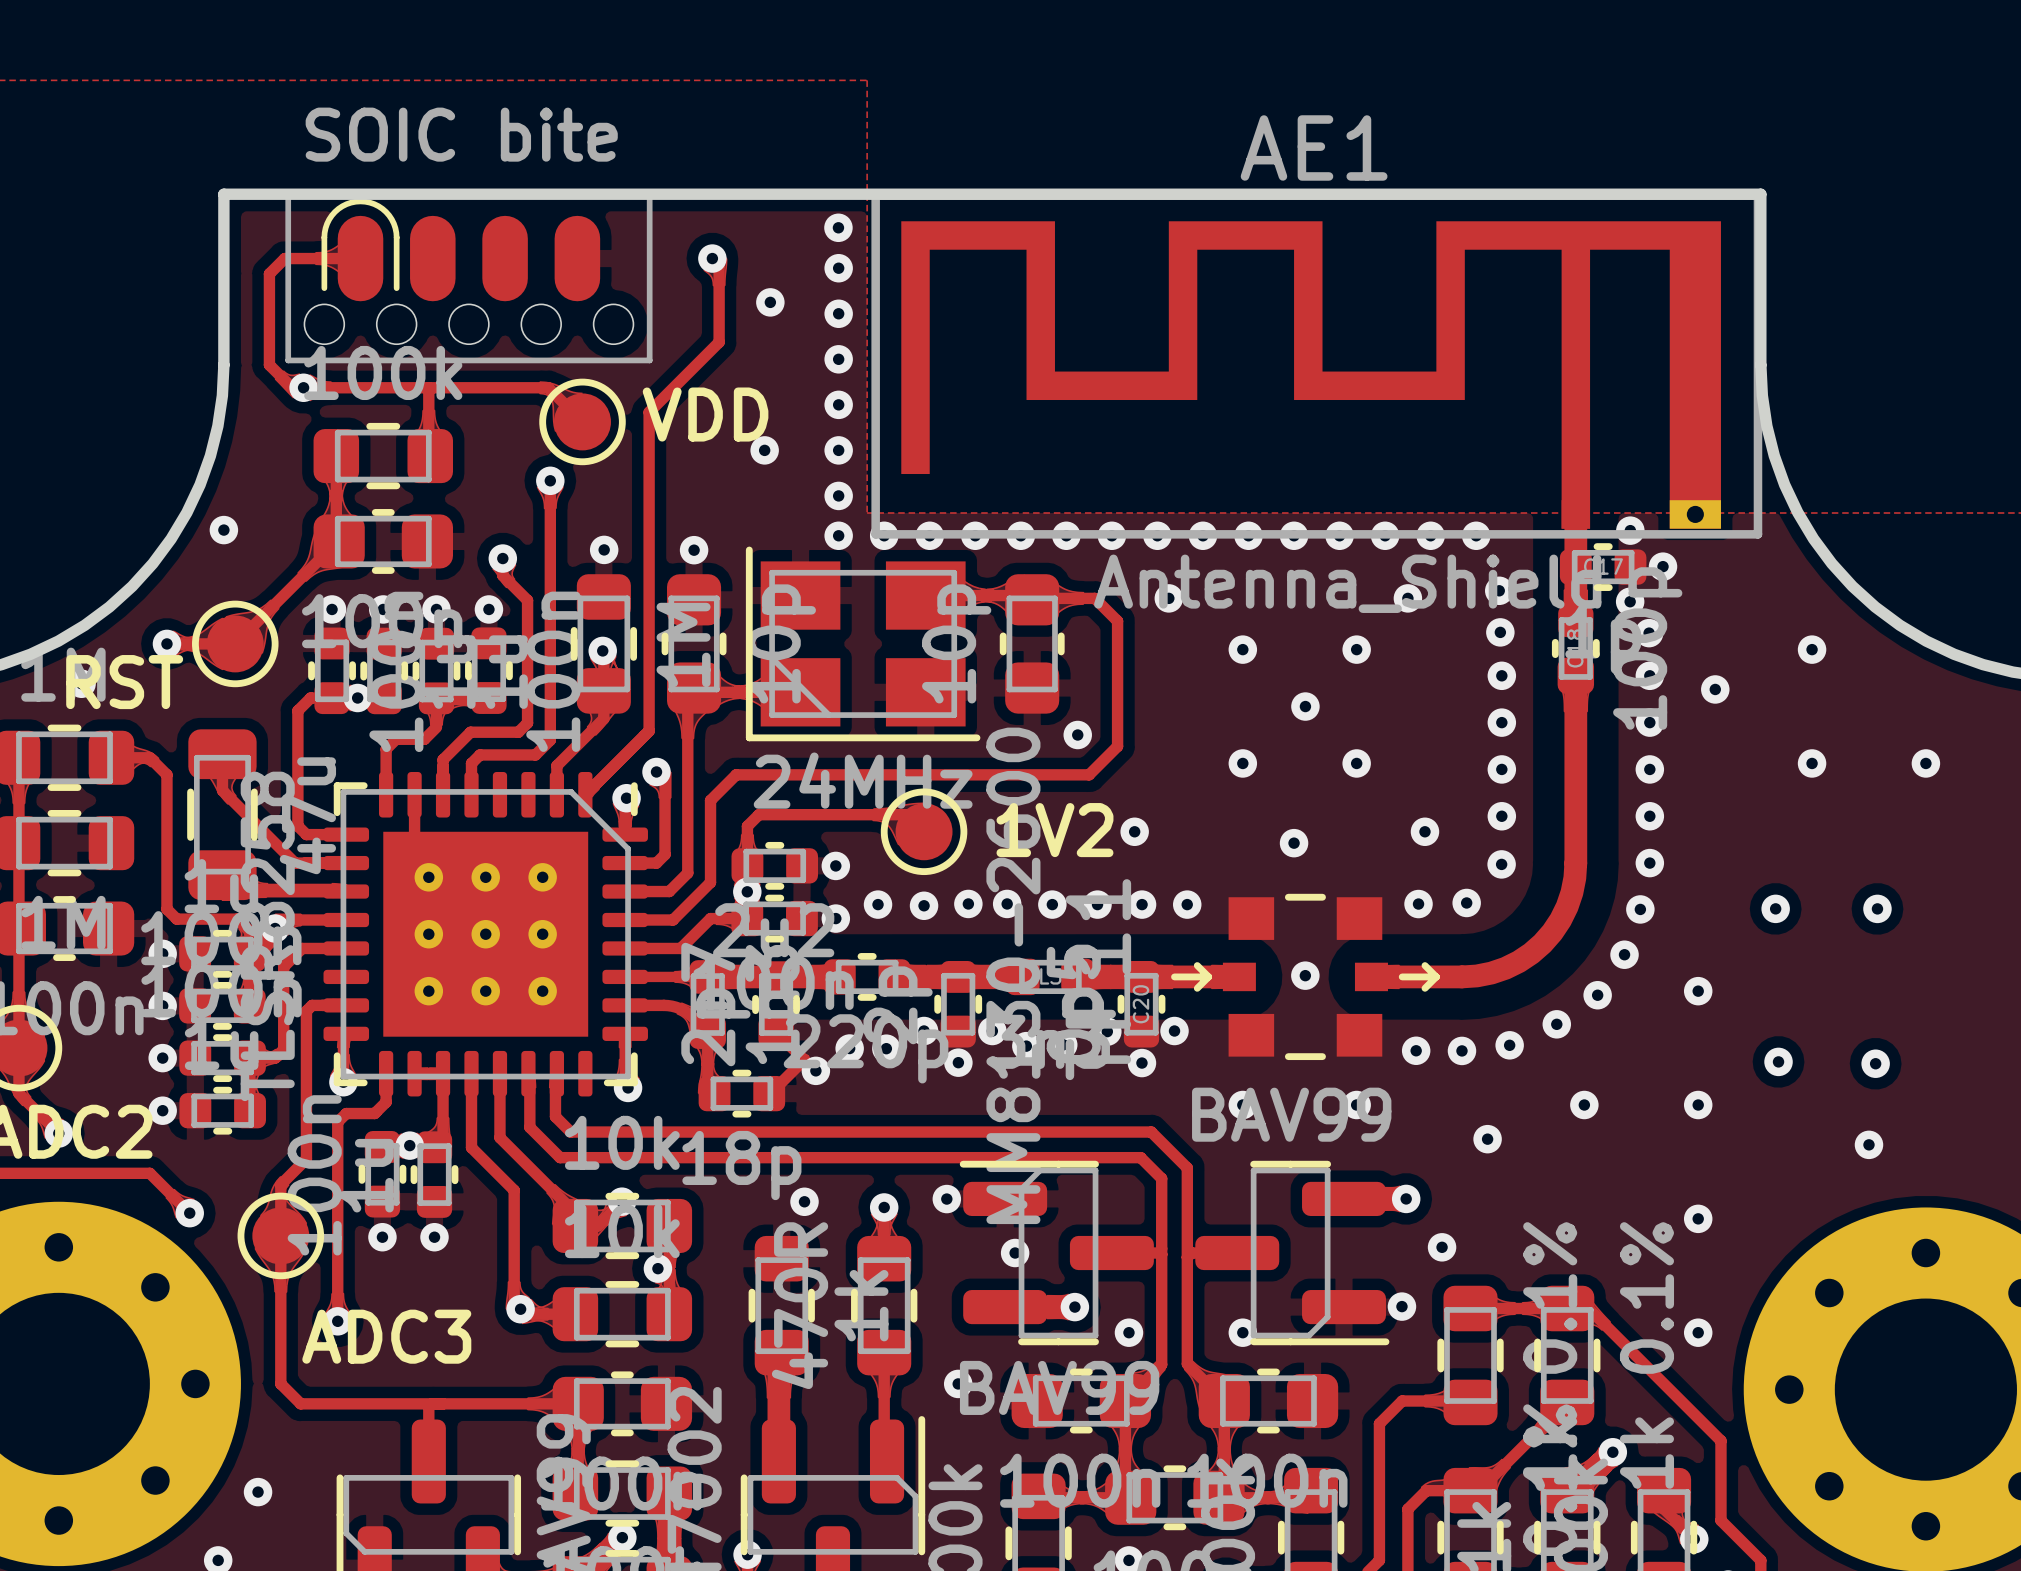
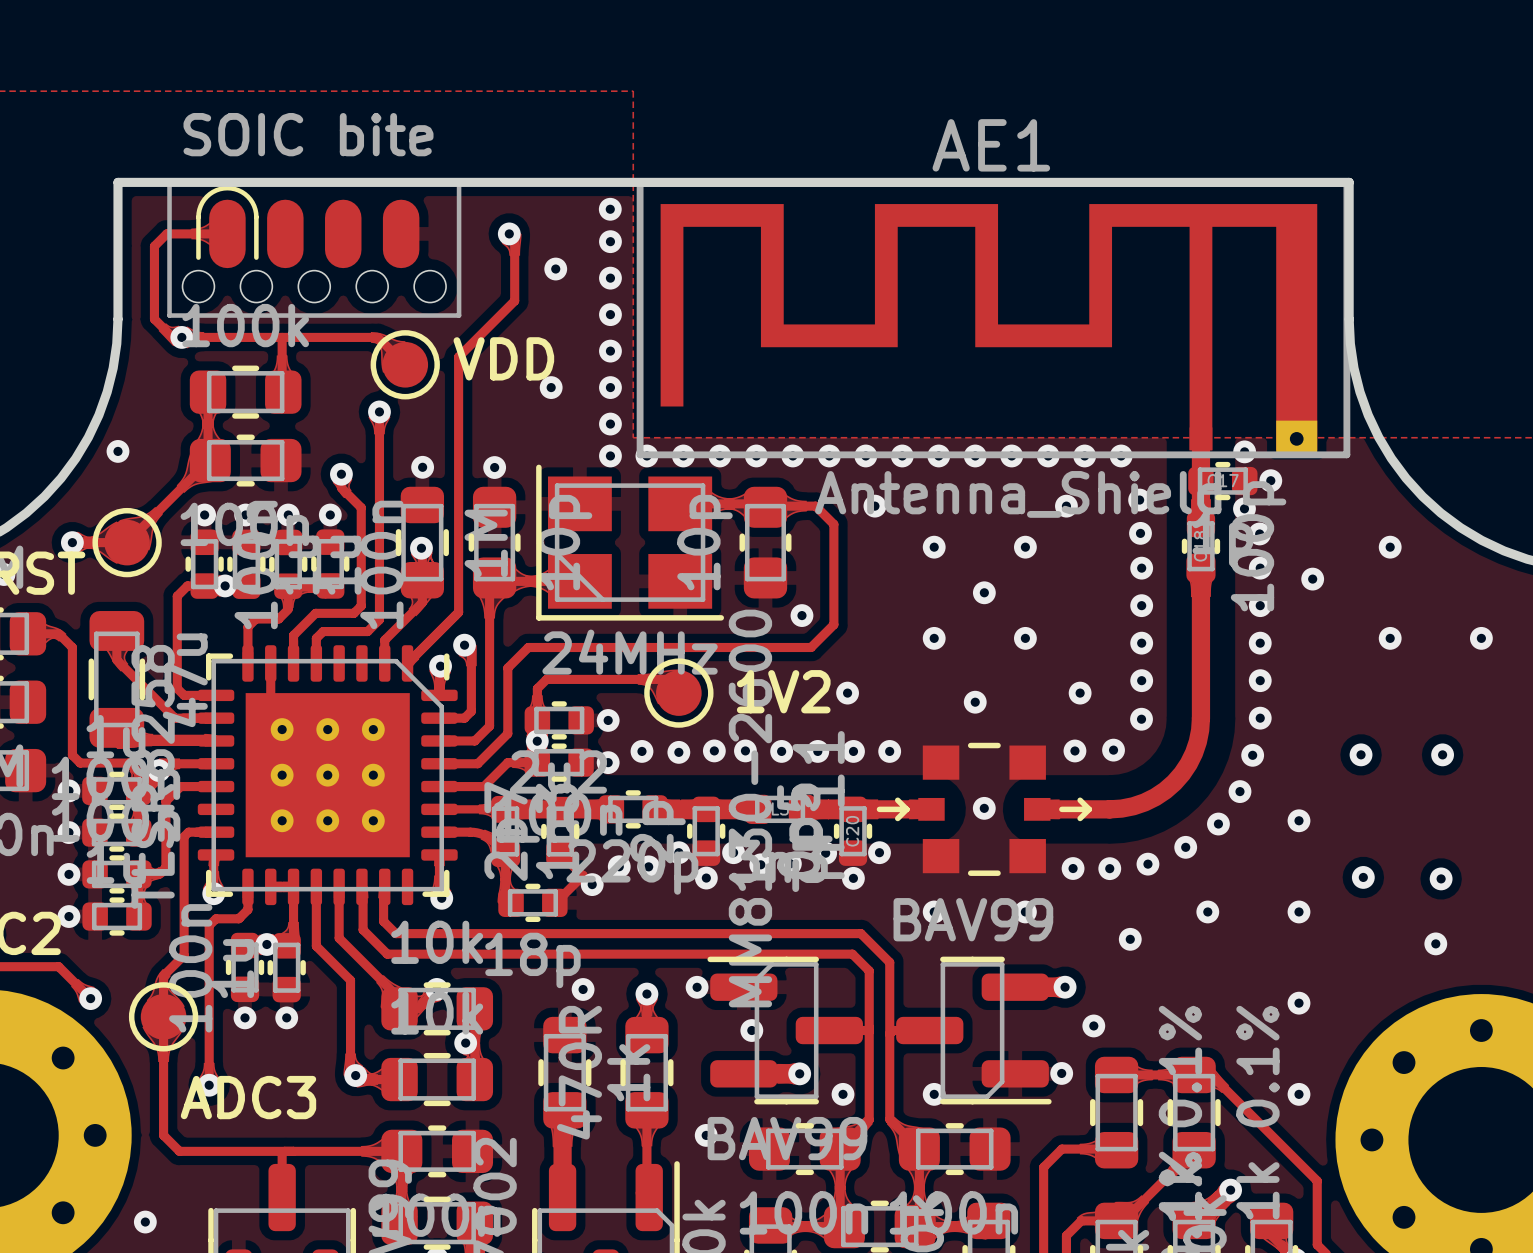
AE1 footprint: [871, 191, 1763, 539] -> [636, 180, 1351, 459]

